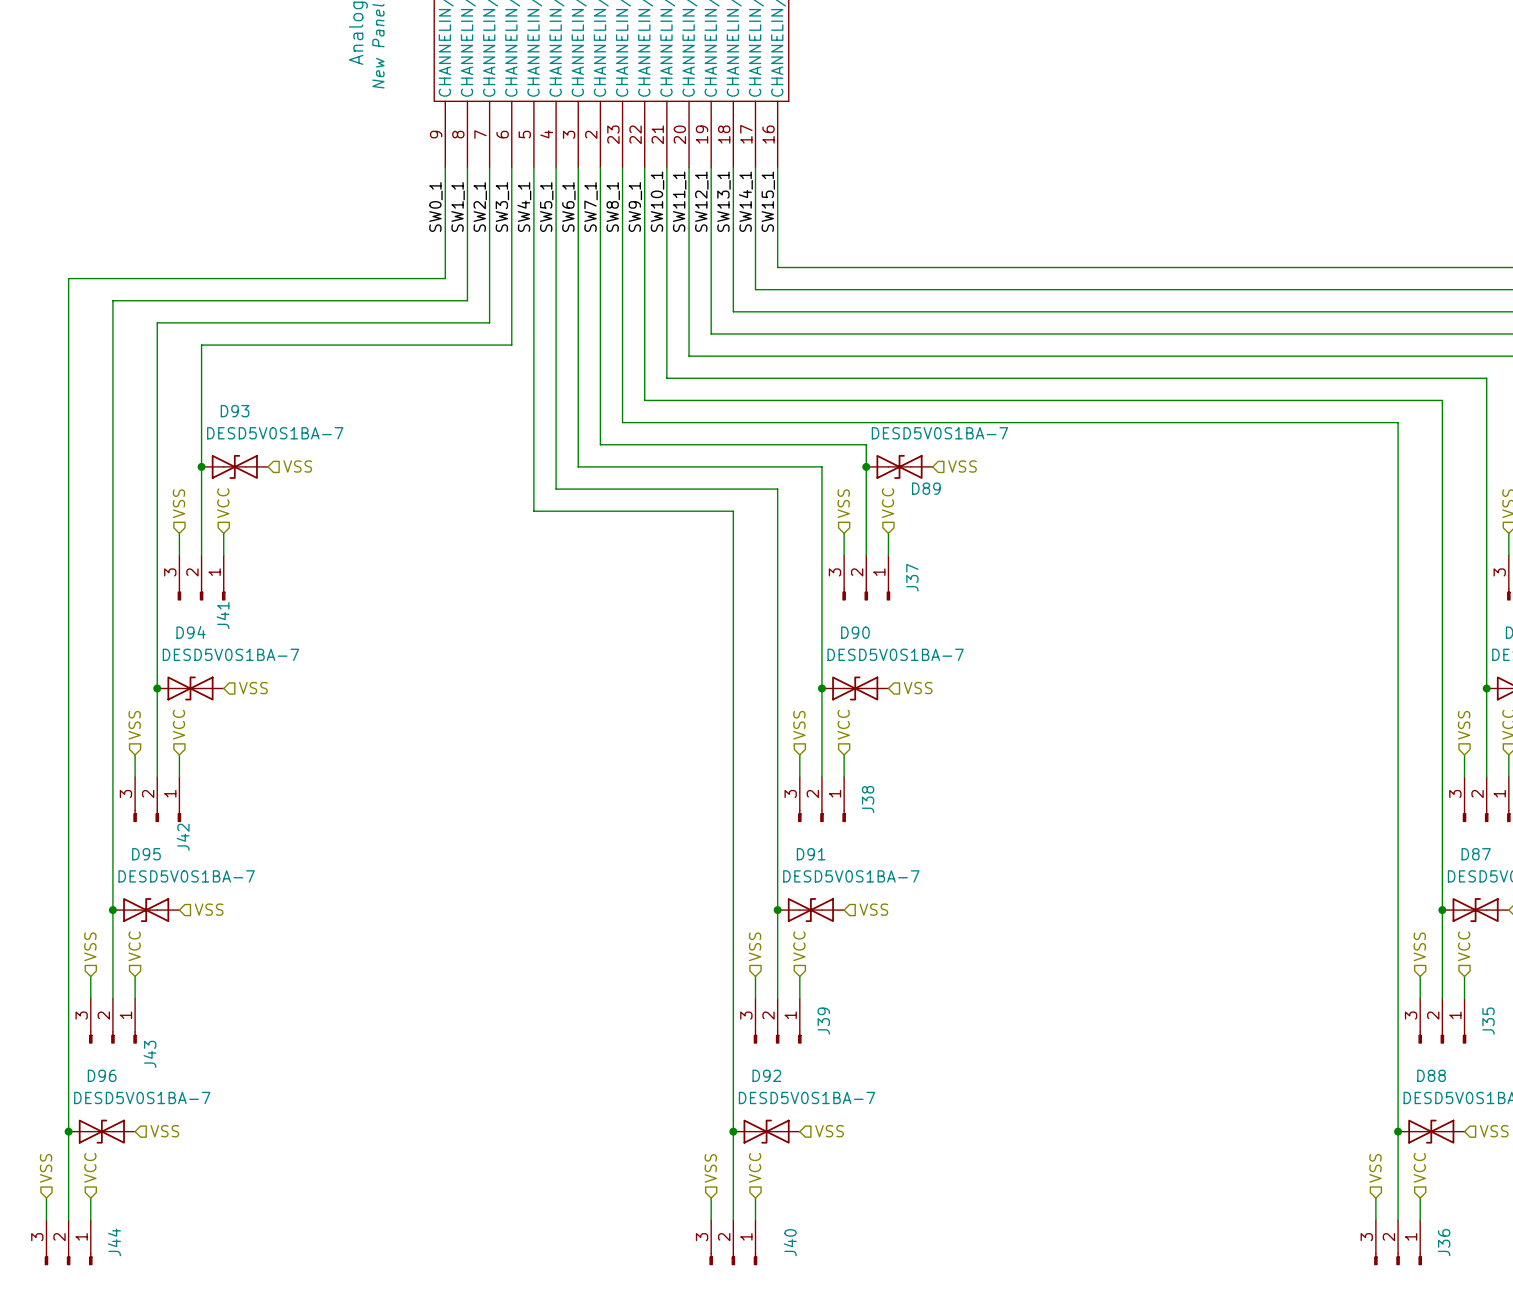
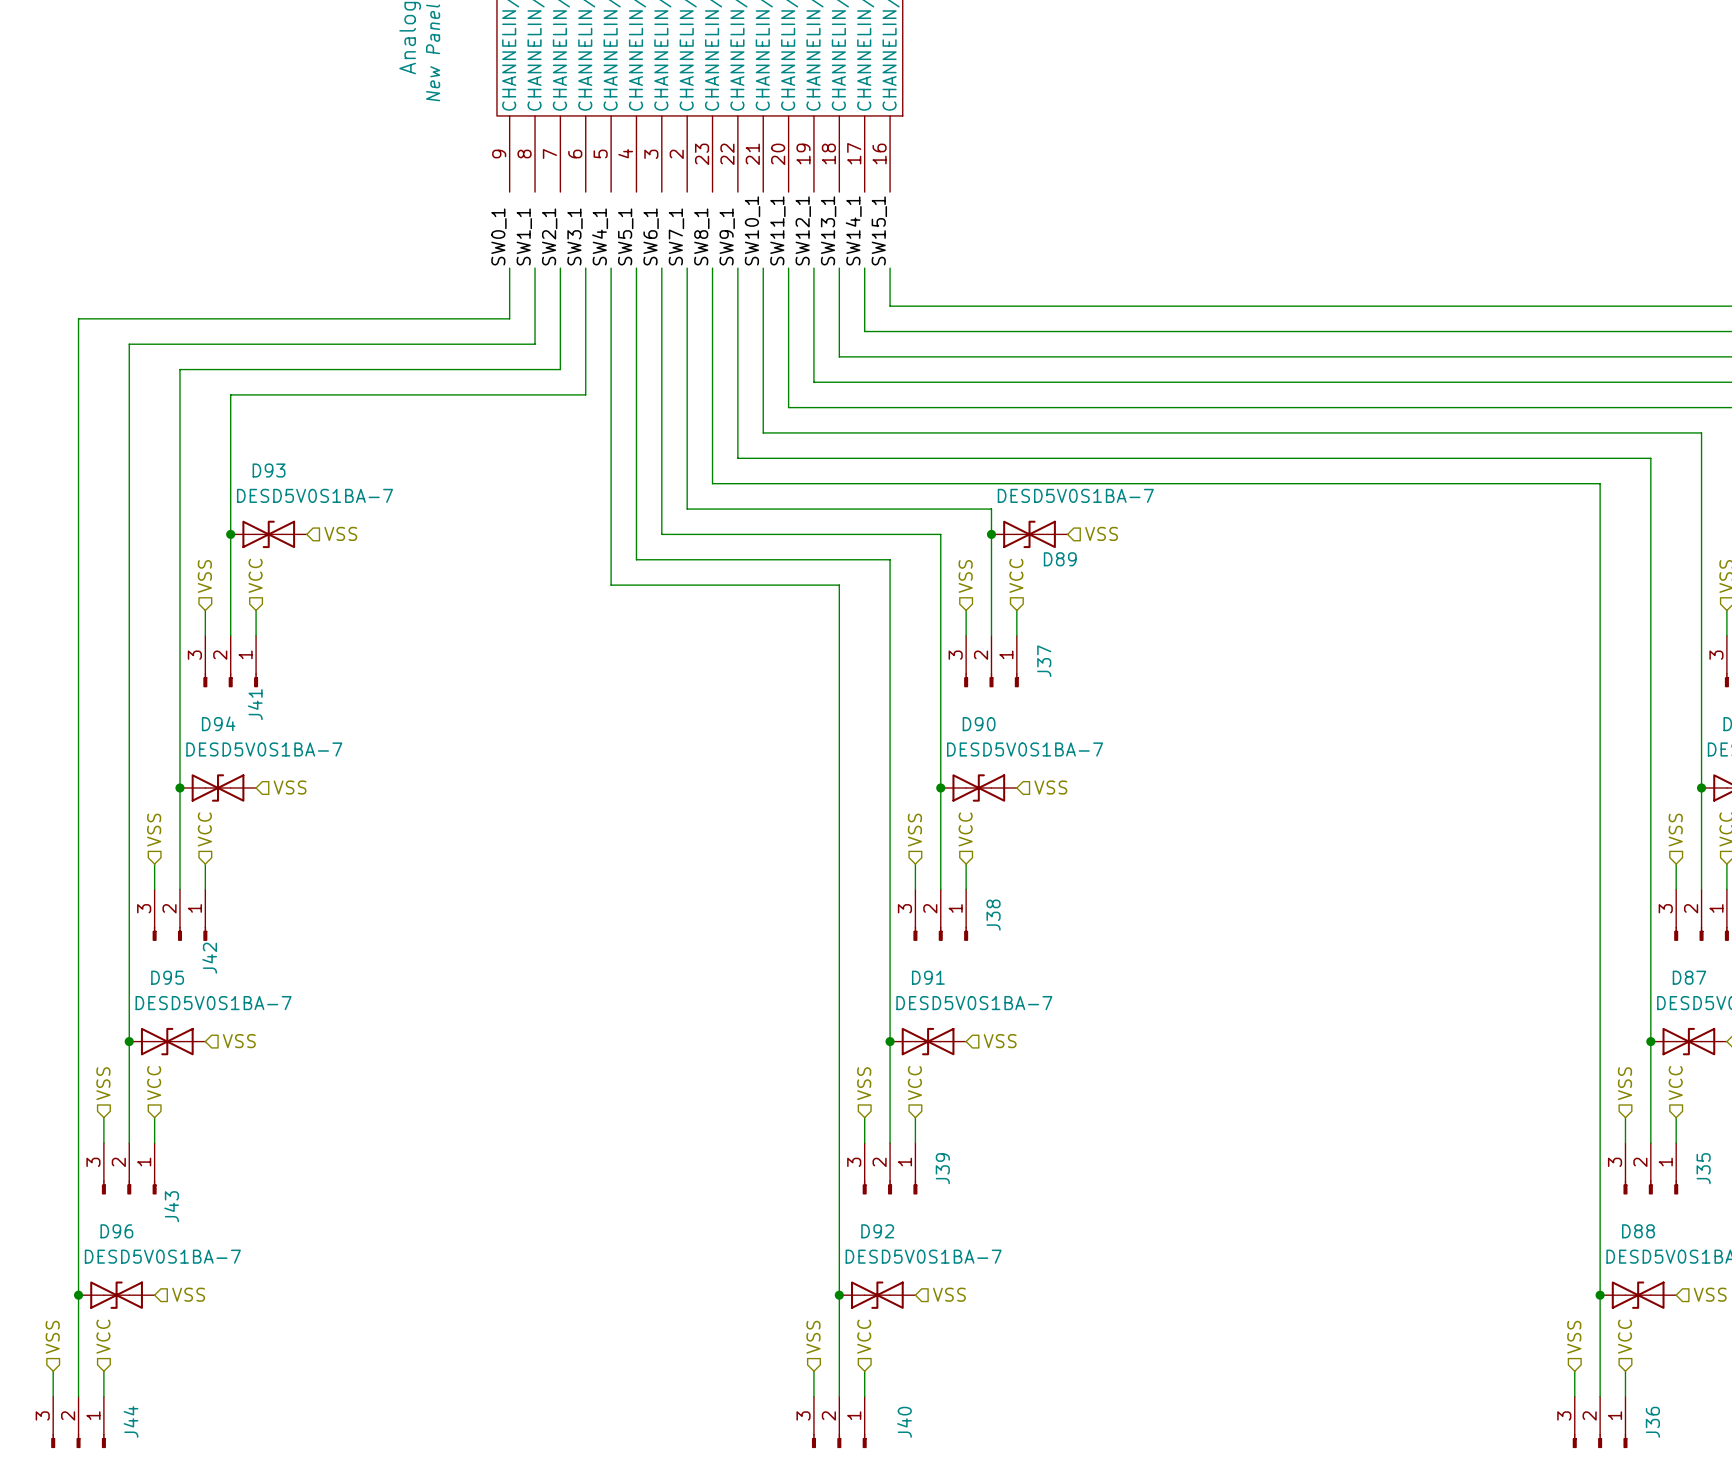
wire: (445, 167) (445, 234) -> none
wire: (467, 167) (467, 234) -> none
wire: (489, 167) (489, 234) -> none
wire: (511, 167) (511, 234) -> none
wire: (533, 167) (533, 234) -> none
wire: (556, 167) (556, 234) -> none
wire: (578, 167) (578, 234) -> none
wire: (600, 167) (600, 234) -> none
wire: (622, 167) (622, 234) -> none
wire: (644, 167) (644, 234) -> none
wire: (666, 167) (666, 234) -> none
wire: (689, 167) (689, 234) -> none
wire: (711, 167) (711, 234) -> none
wire: (733, 167) (733, 234) -> none
wire: (755, 167) (755, 234) -> none
wire: (777, 167) (777, 234) -> none

